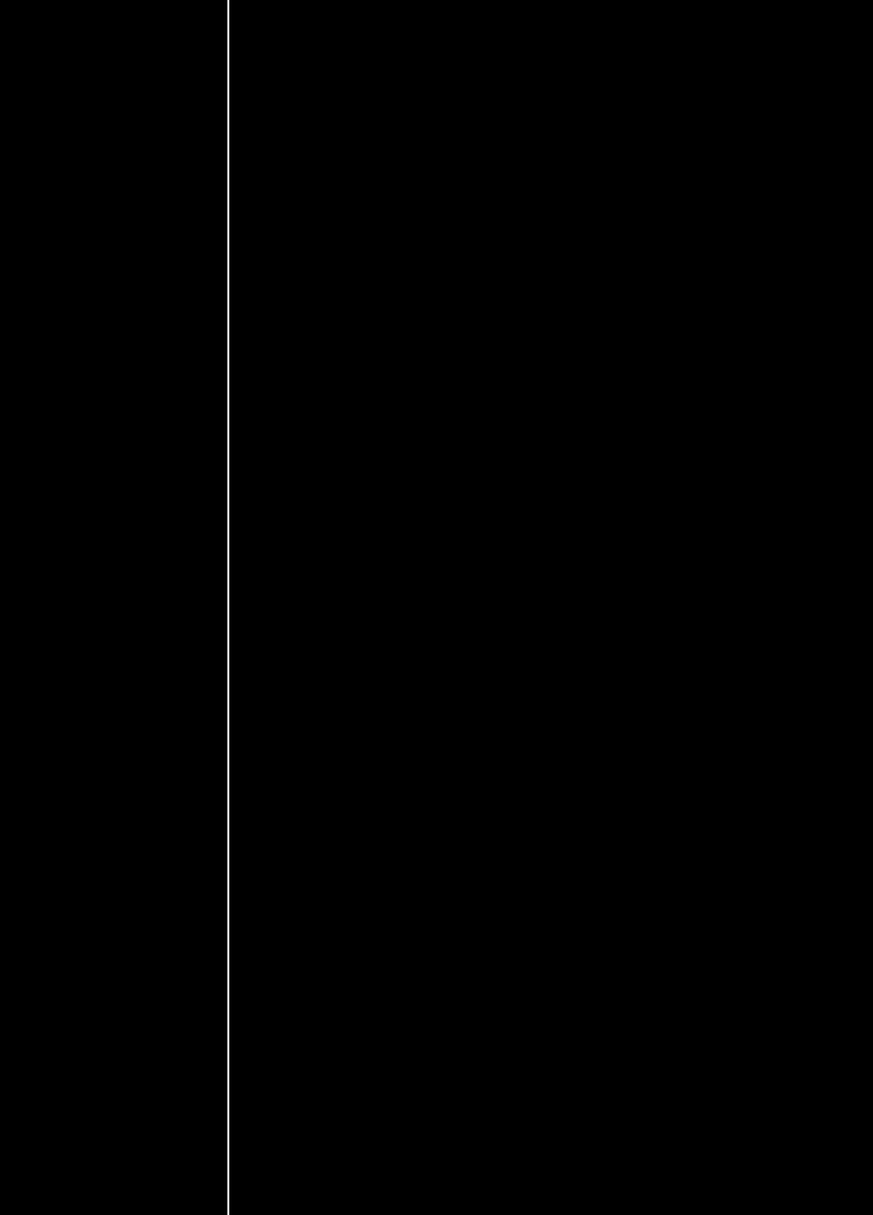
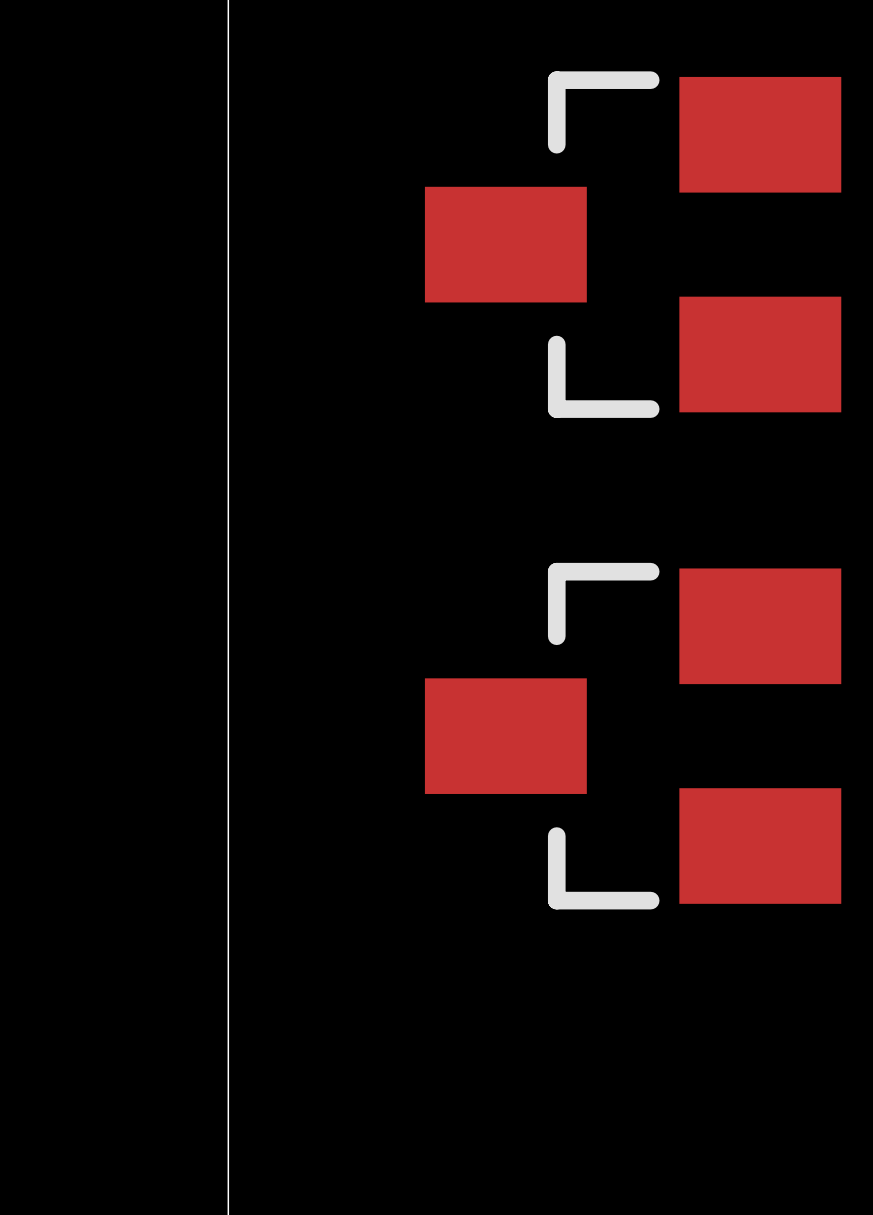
part: none -> (633, 244)
part: none -> (633, 736)

